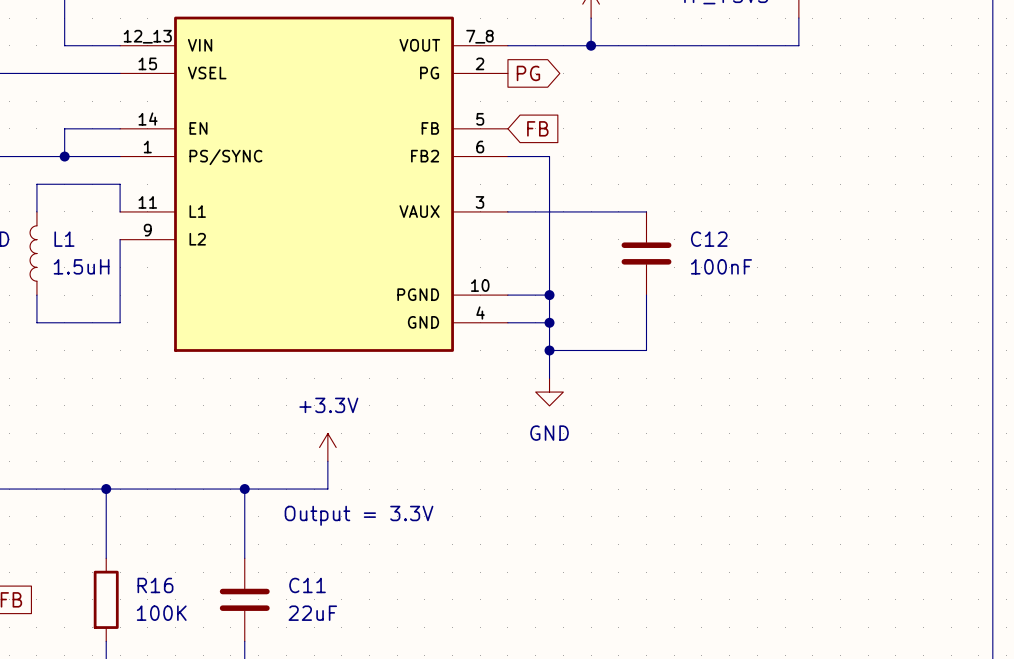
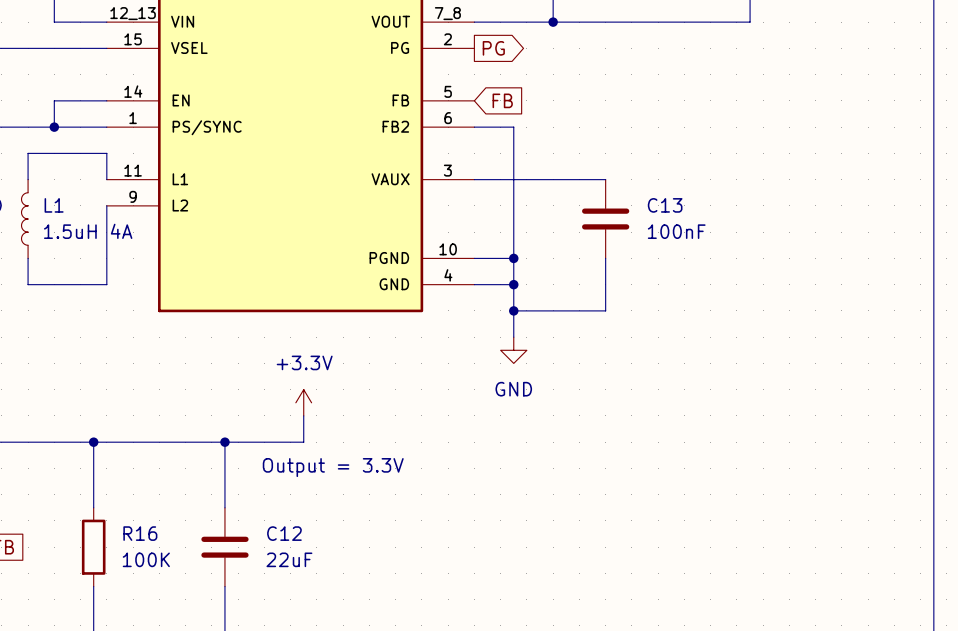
C12 name: C12 (709, 239) -> C13 (665, 205)
L1 value: 1.5uH (81, 266) -> 1.5uH 4A (88, 231)
C11 name: C11 (307, 585) -> C12 (284, 533)

